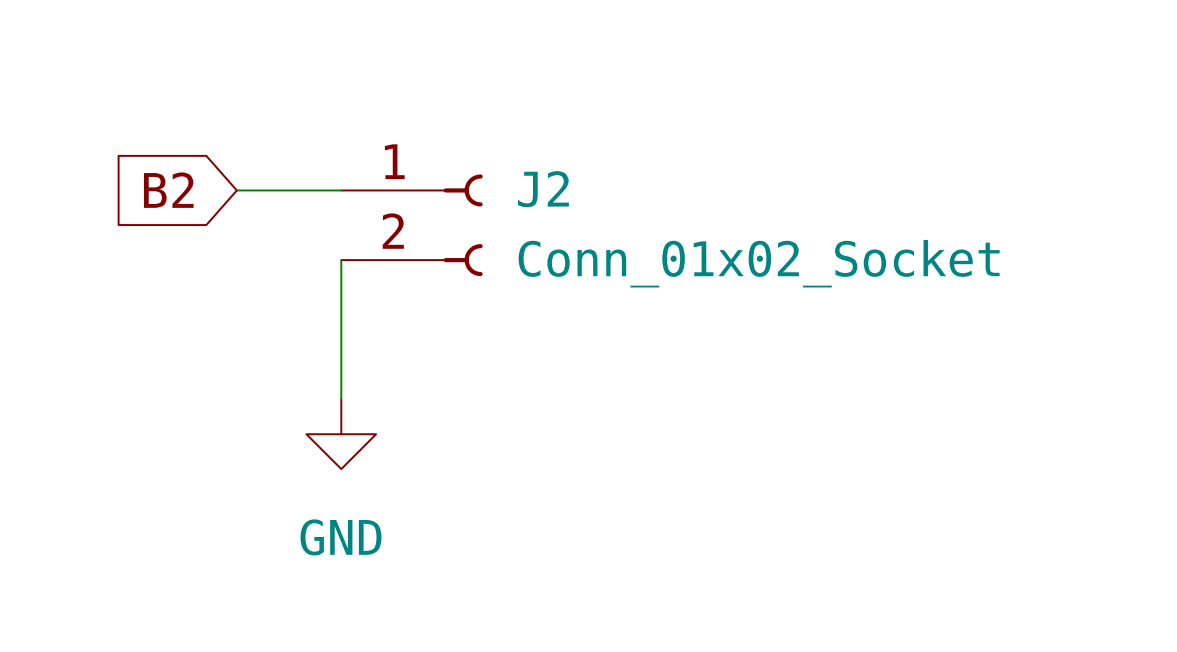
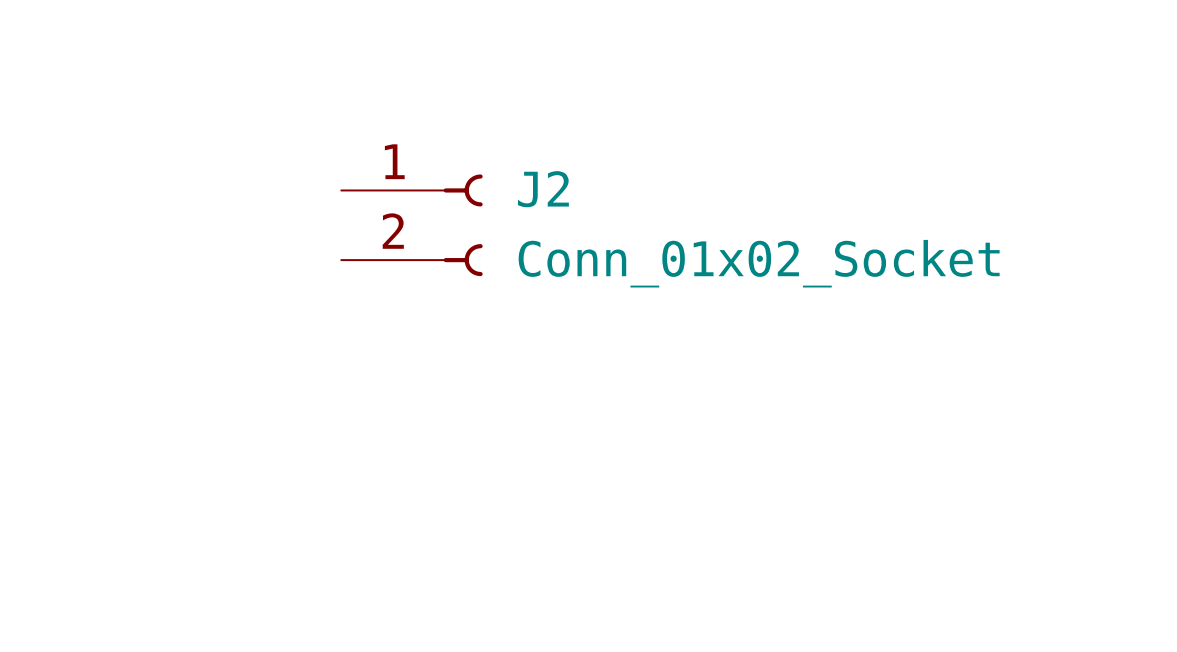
global label: B2 (168, 190) -> none
wire: (236, 190) (341, 190) -> none
wire: (341, 260) (341, 399) -> none
power symbol: GND (341, 434) -> none

